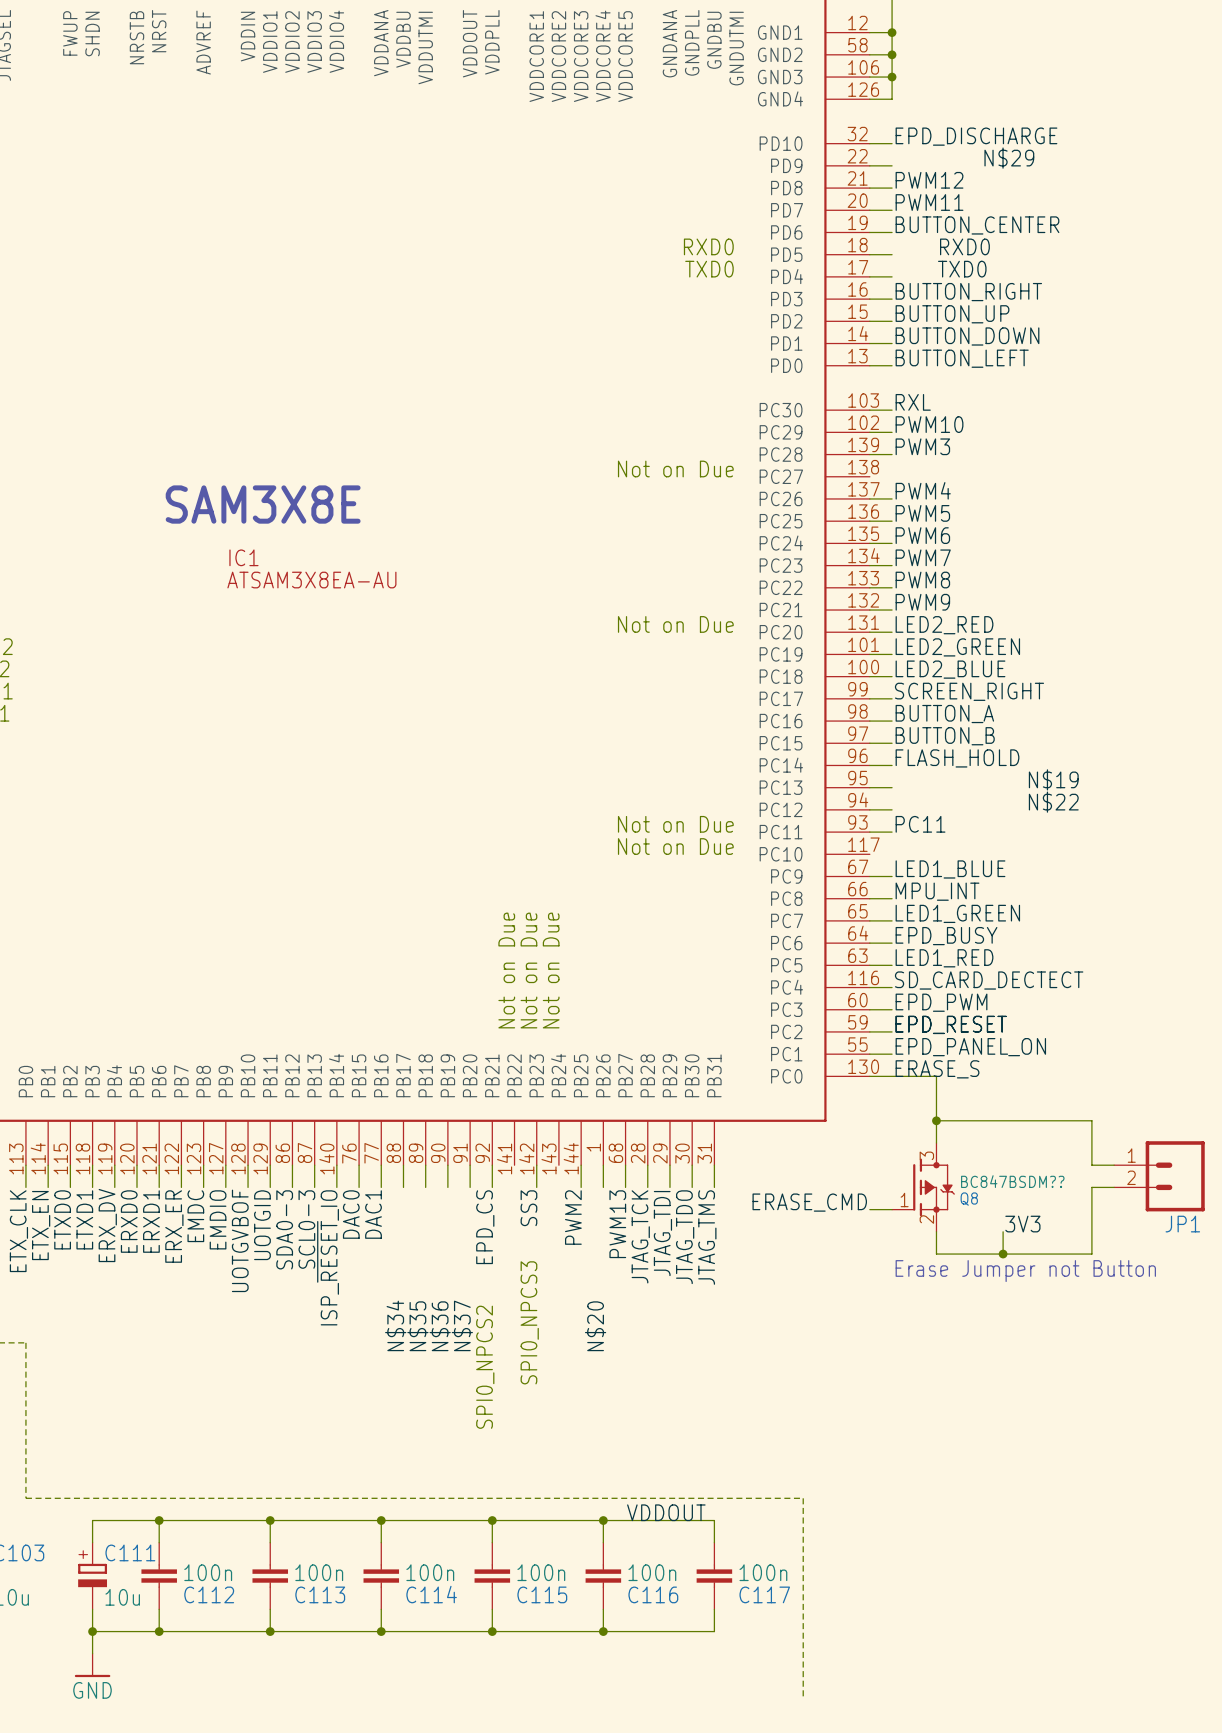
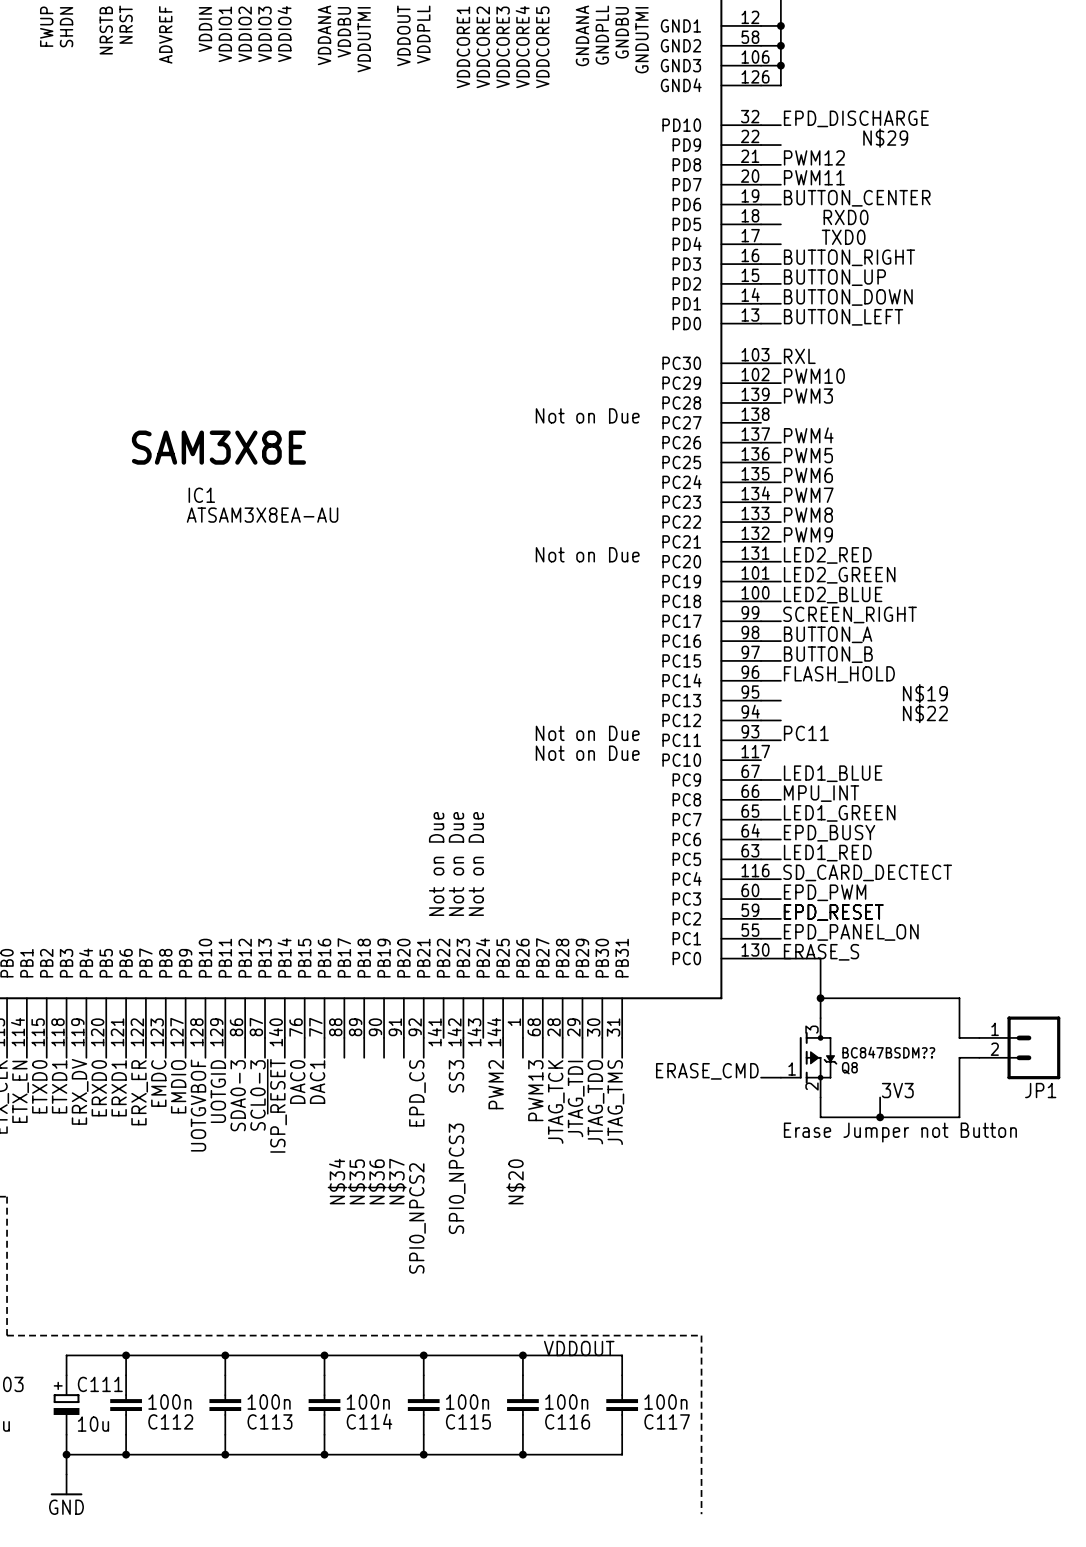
text: RXD0 (708, 246) -> none
text: TXD0 (709, 269) -> none
label: ISP_~{RESET}_IO (328, 1257) -> ISP_~{RESET} (276, 1105)

